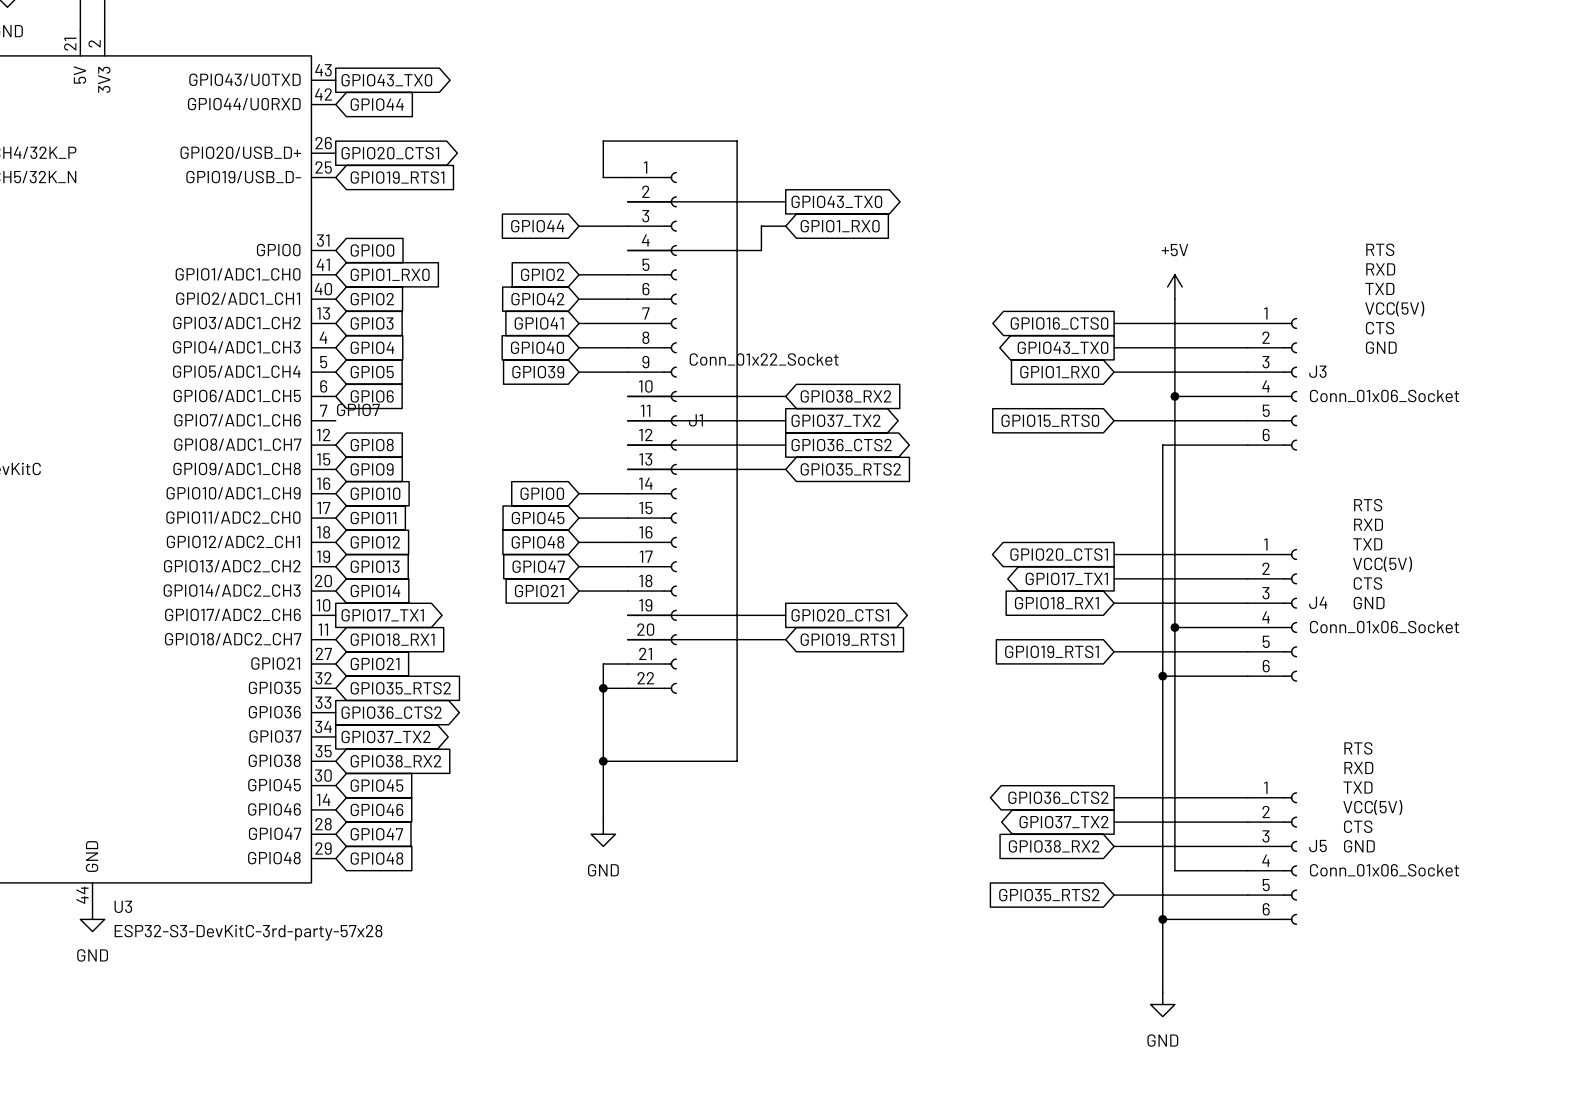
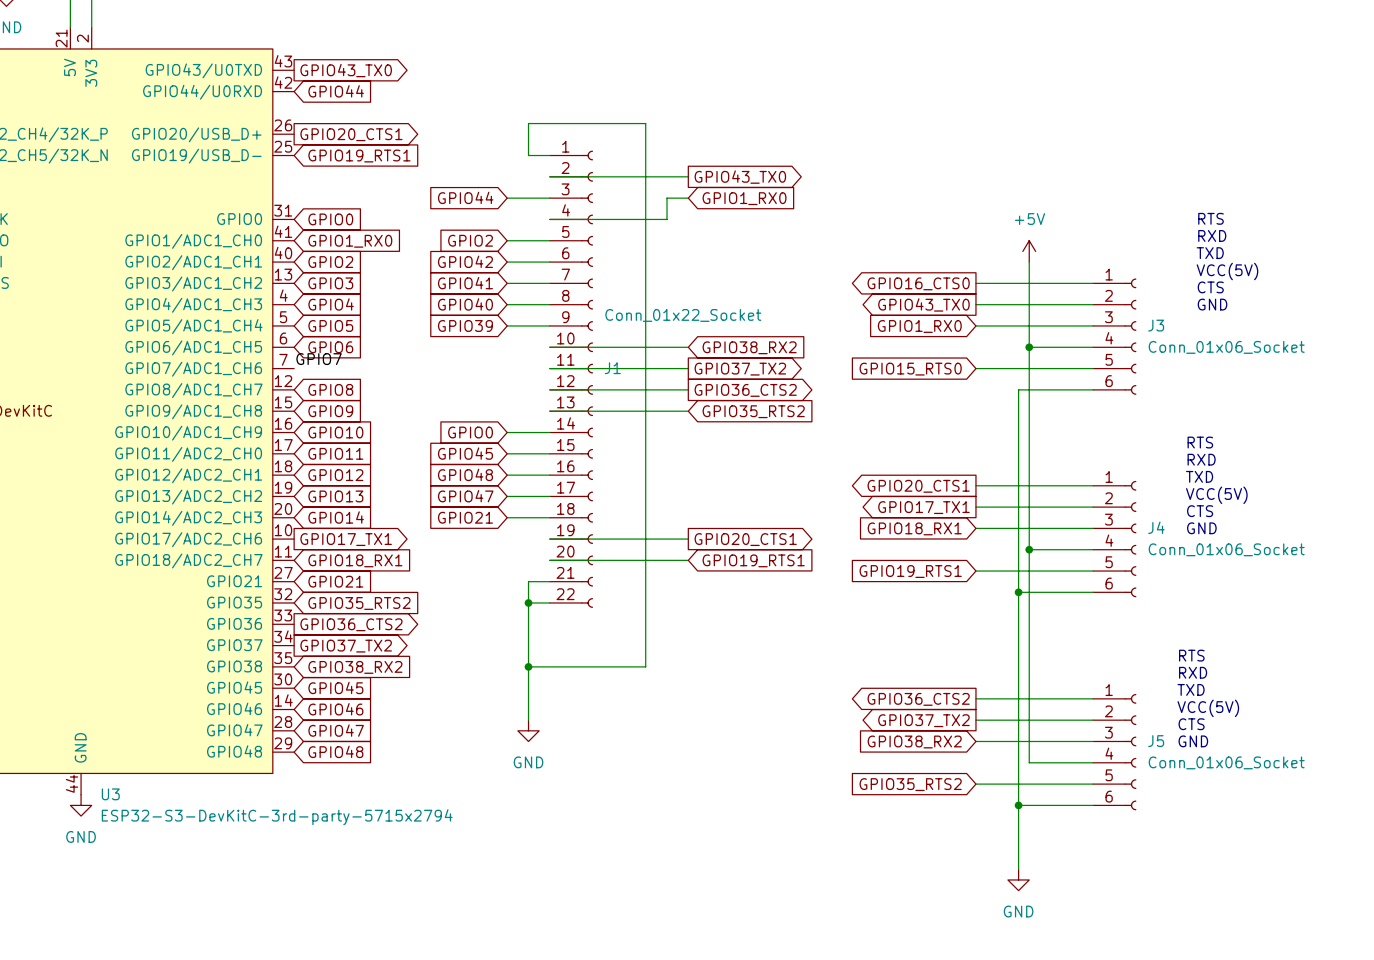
U3 value: ESP32-S3-DevKitC-3rd-party-57x28 (248, 932) -> ESP32-S3-DevKitC-3rd-party-5715x2794 (277, 817)

